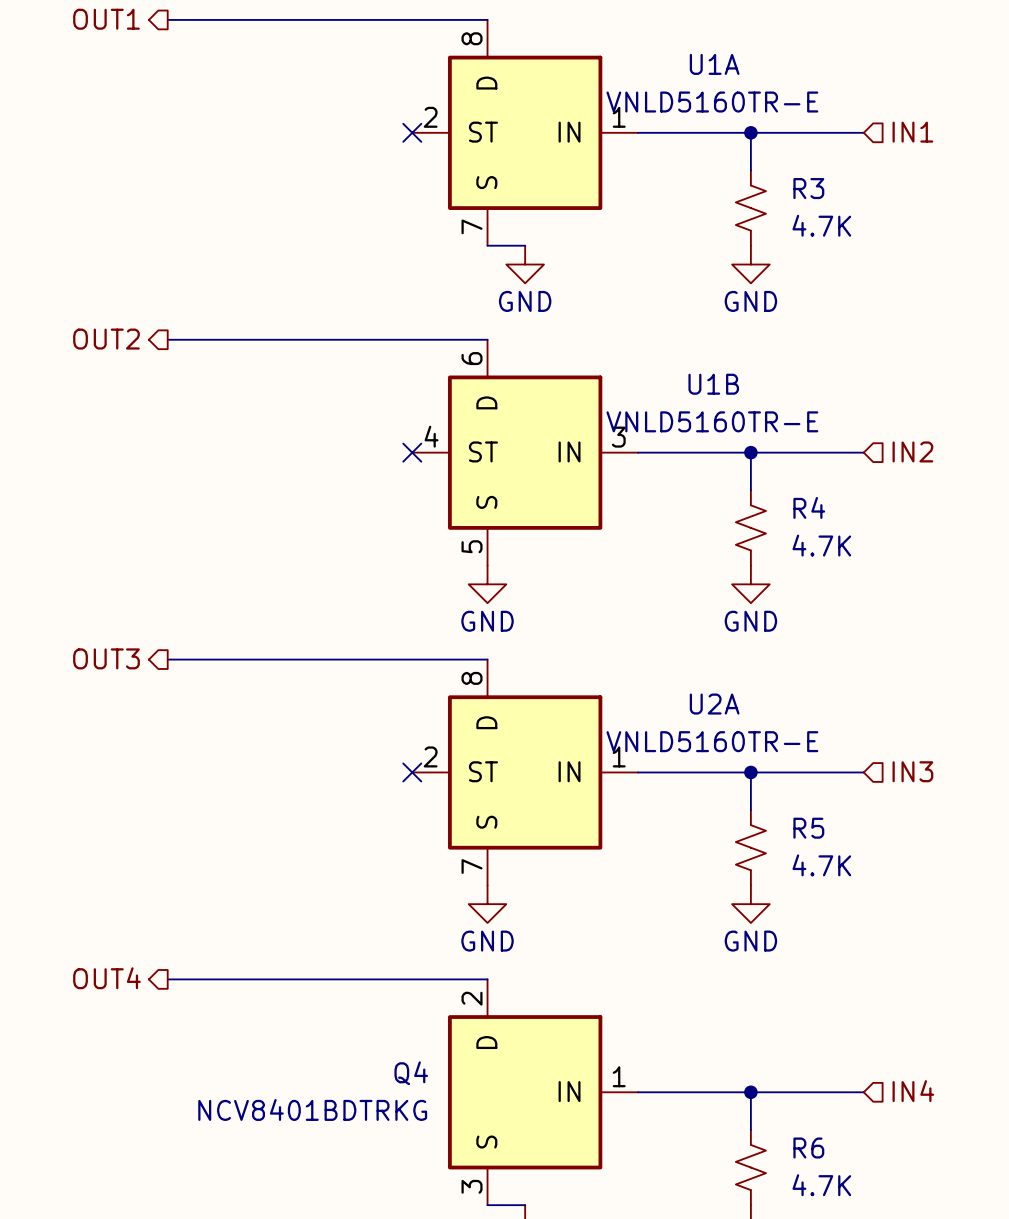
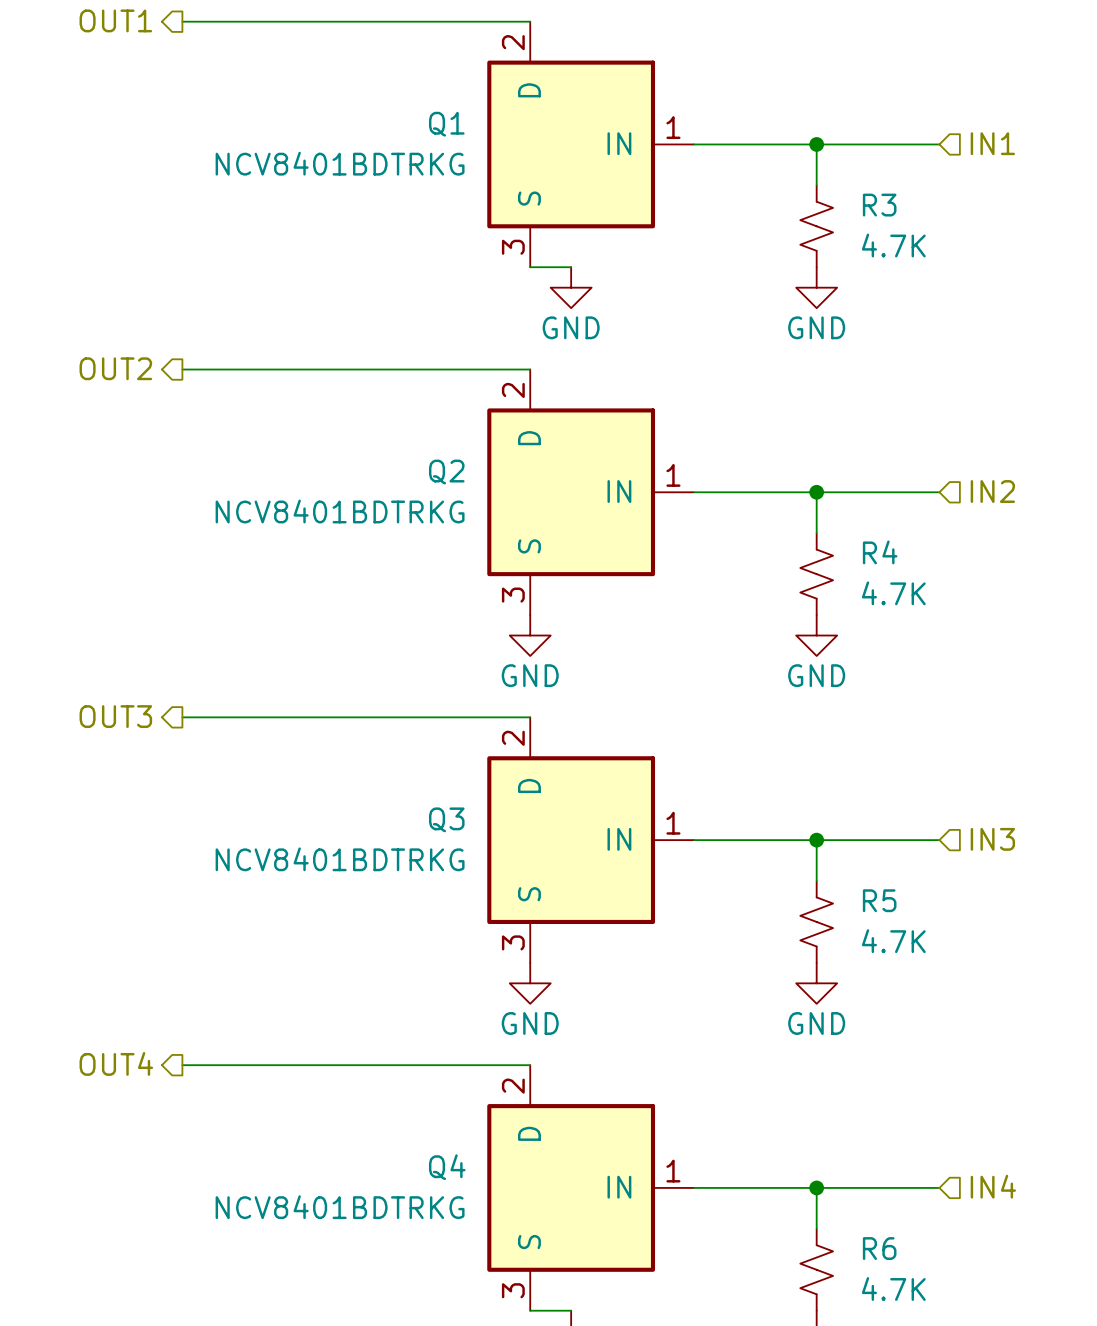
no-connect mark: (412, 132) -> none
U1A: VNLD5160TR-E (525, 132) -> none
Q1: none -> NCV8401BDTRKG (590, 144)
no-connect mark: (412, 452) -> none
U1B: VNLD5160TR-E (525, 452) -> none
Q2: none -> NCV8401BDTRKG (590, 492)
no-connect mark: (412, 772) -> none
U2A: VNLD5160TR-E (525, 772) -> none
Q3: none -> NCV8401BDTRKG (590, 840)

